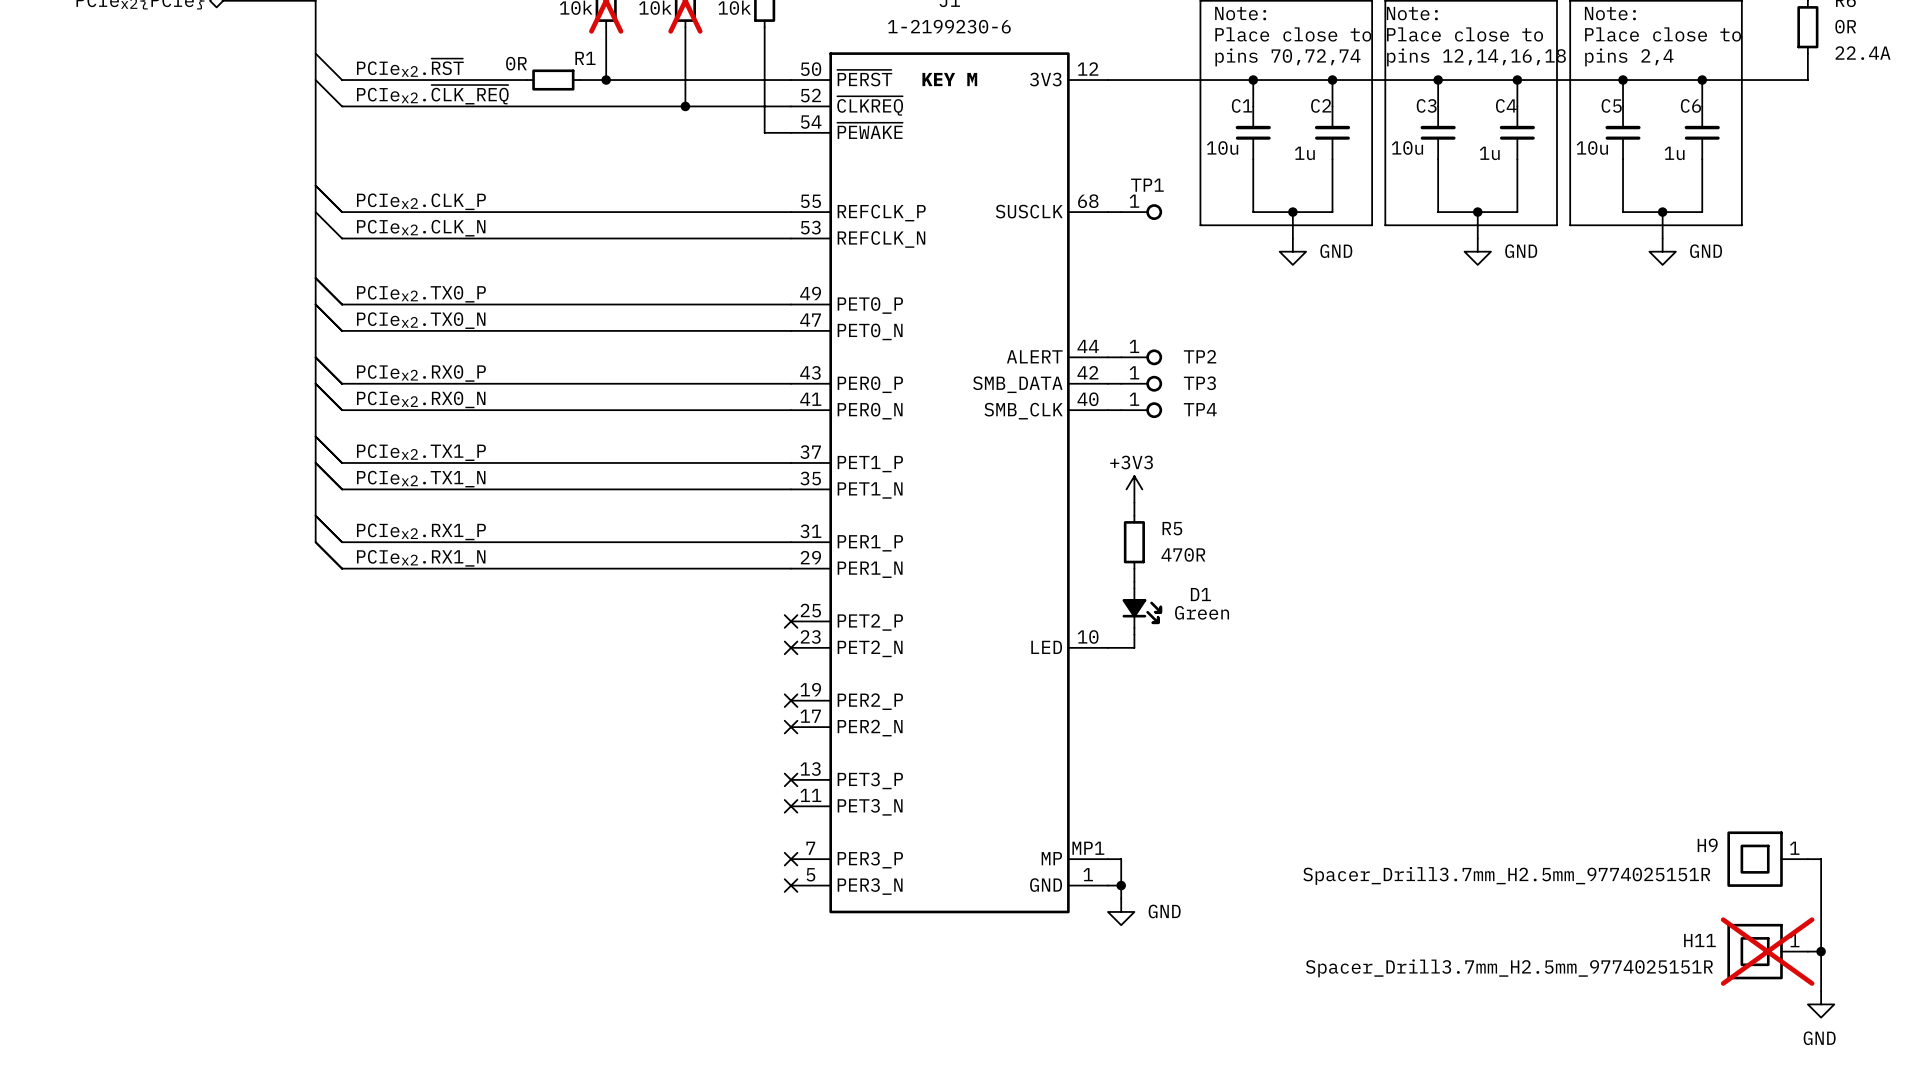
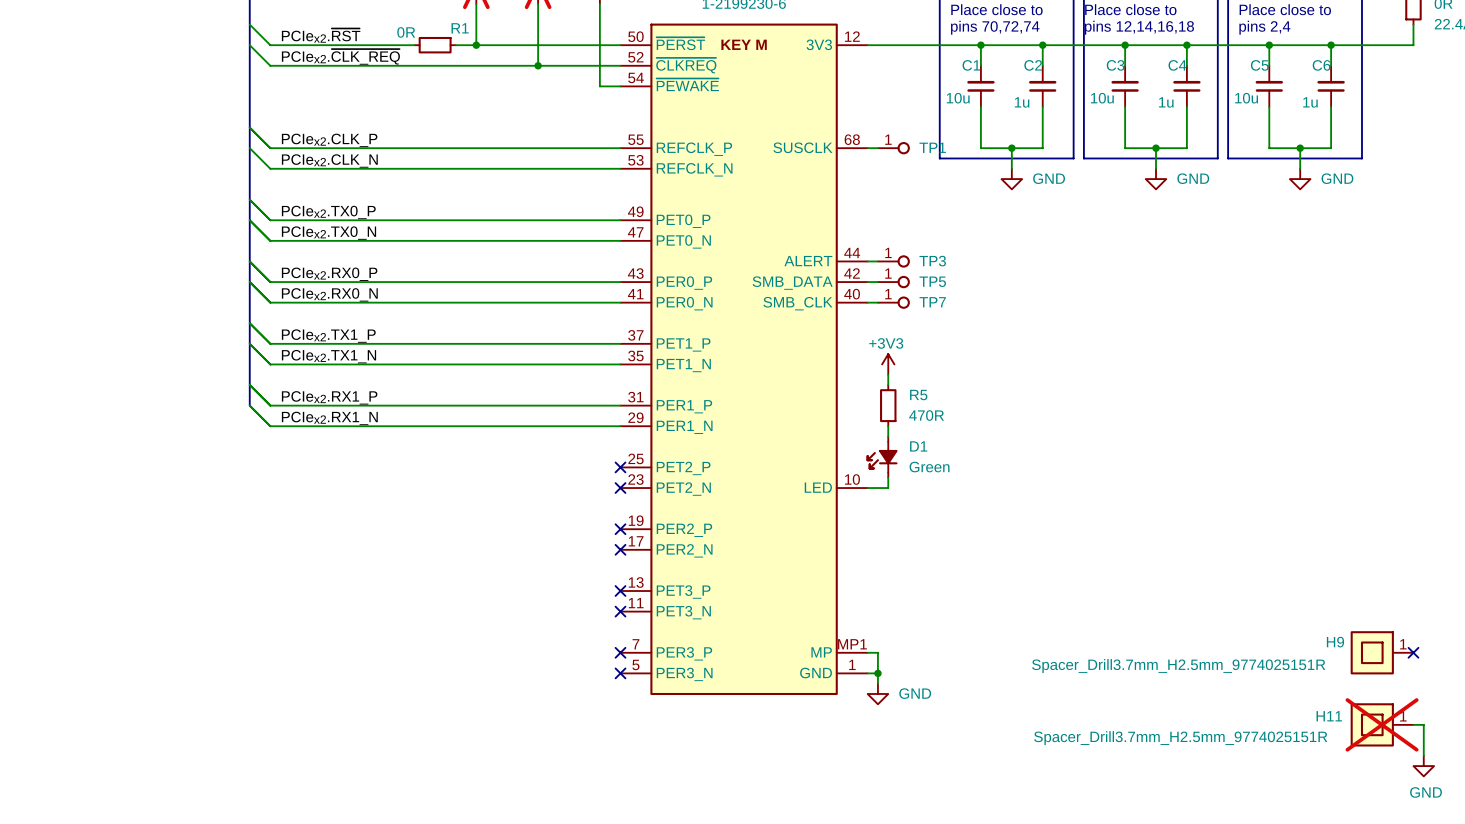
TP1 name position: TP1 (1147, 185) -> TP1 (932, 147)
TP2 name: TP2 (1200, 356) -> TP3 (932, 261)
TP3 name: TP3 (1199, 383) -> TP5 (932, 281)
TP4 name: TP4 (1200, 409) -> TP7 (932, 302)
D1 flip: as is (1142, 608) -> left-right (882, 457)
wire: (1807, 859) (1821, 859) (1821, 951) -> none
no-connect mark: none -> (1413, 652)
junction: (1821, 951) -> none

